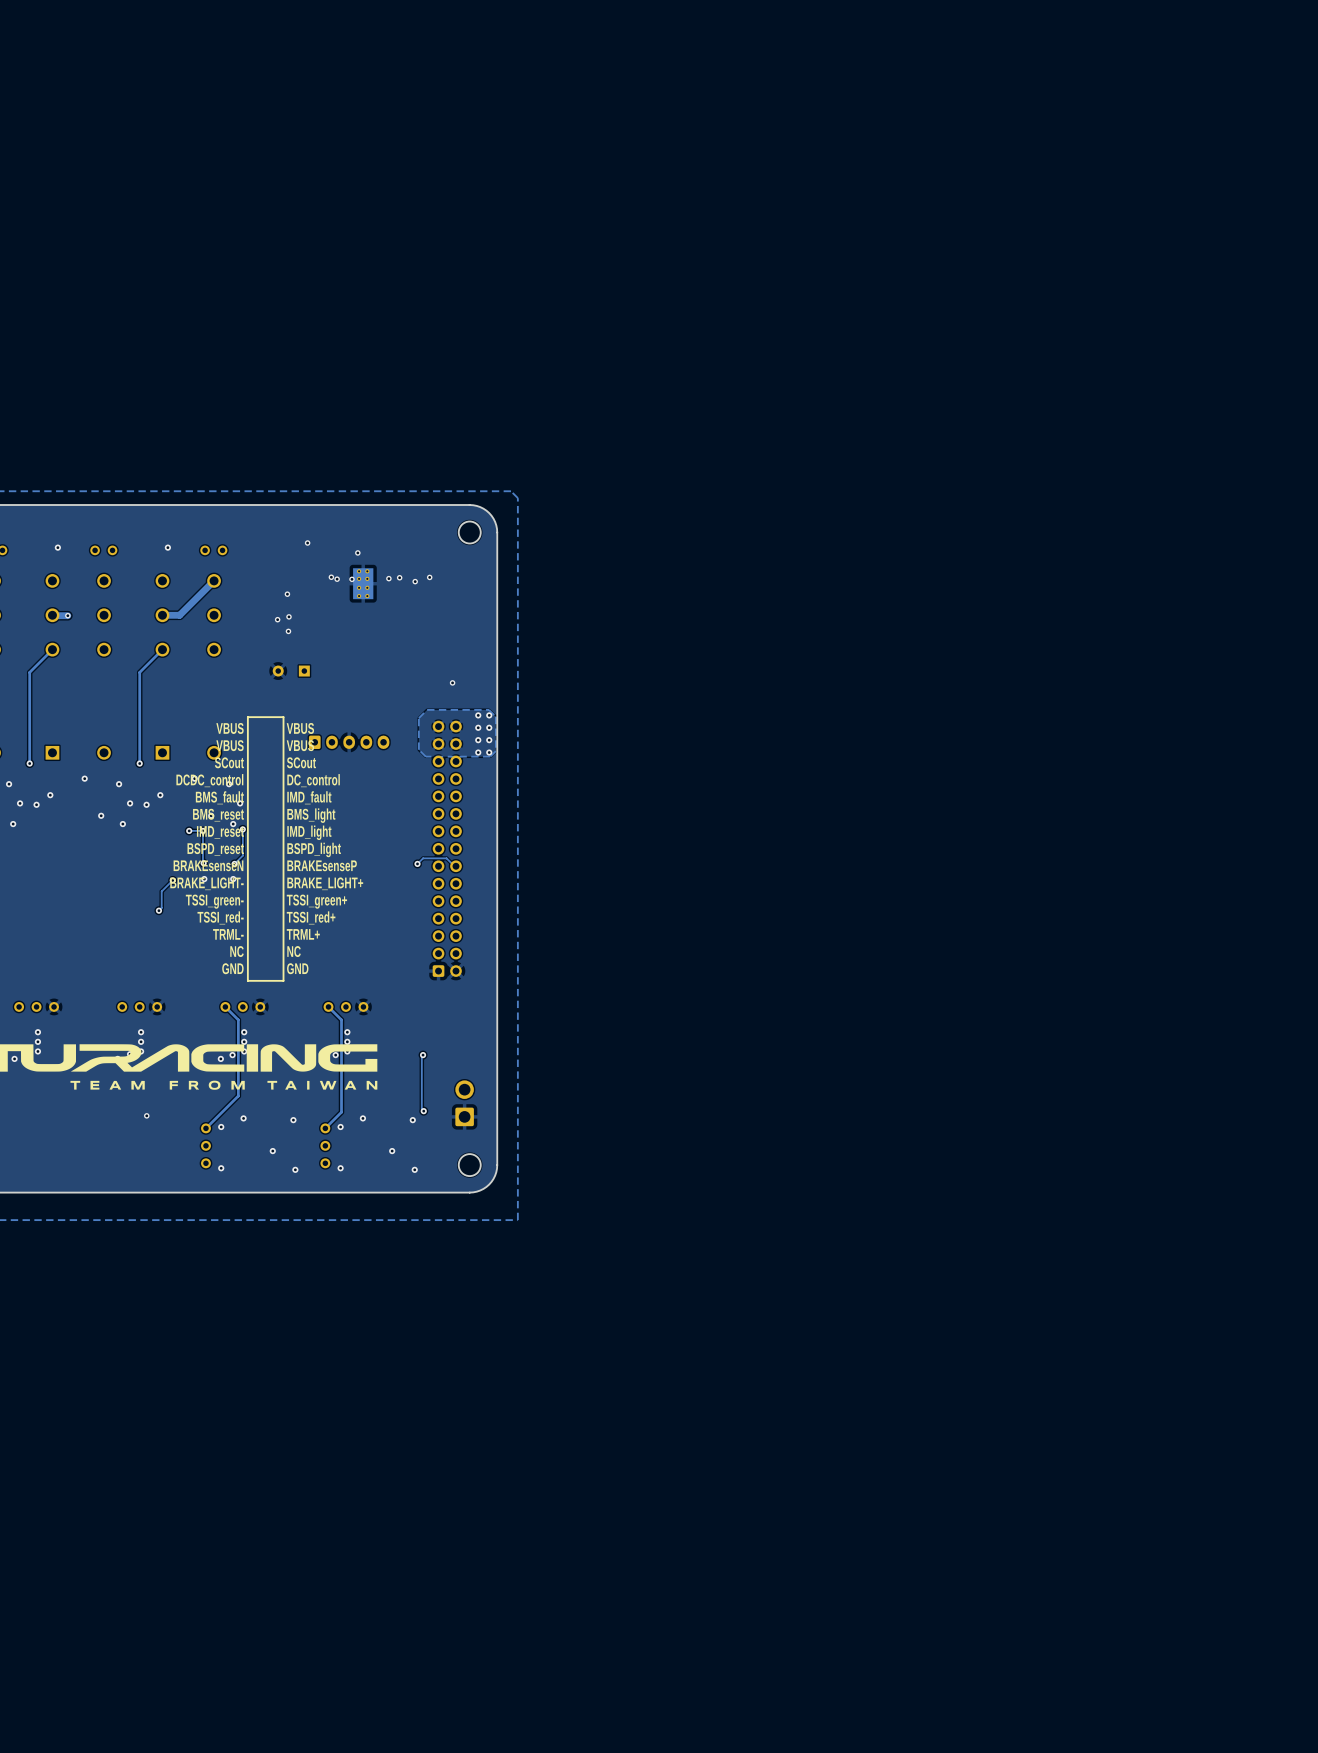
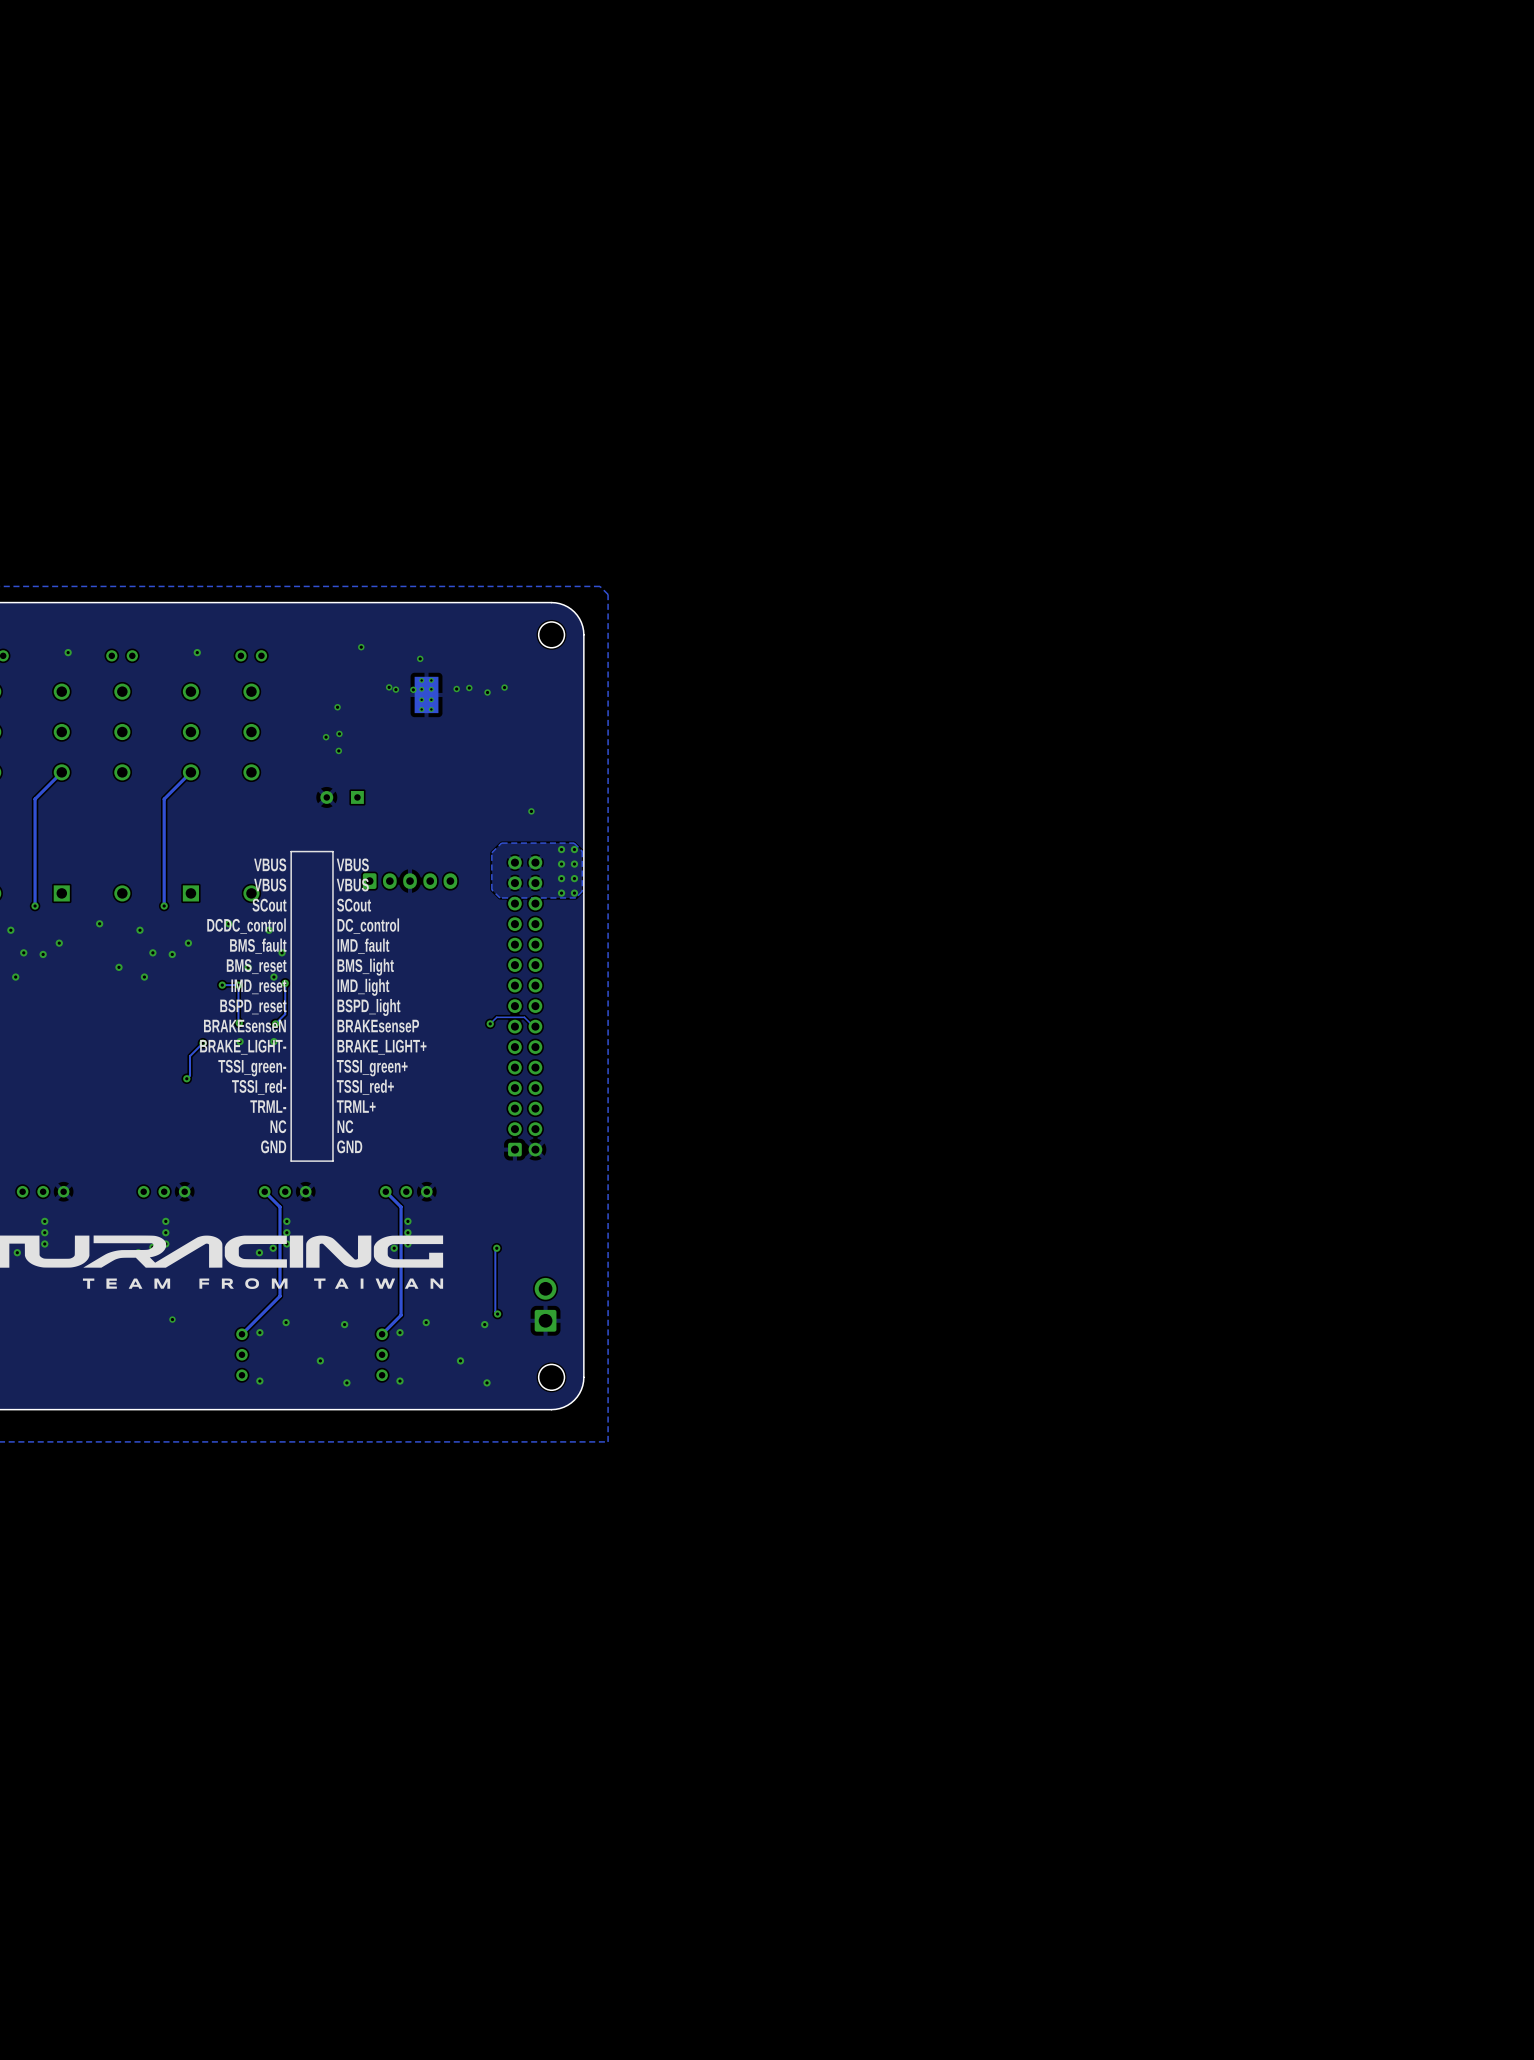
track: (214, 580) (179, 615) (162, 615) -> none
track: (52, 615) (67, 615) -> none
via: (67, 615) -> none

